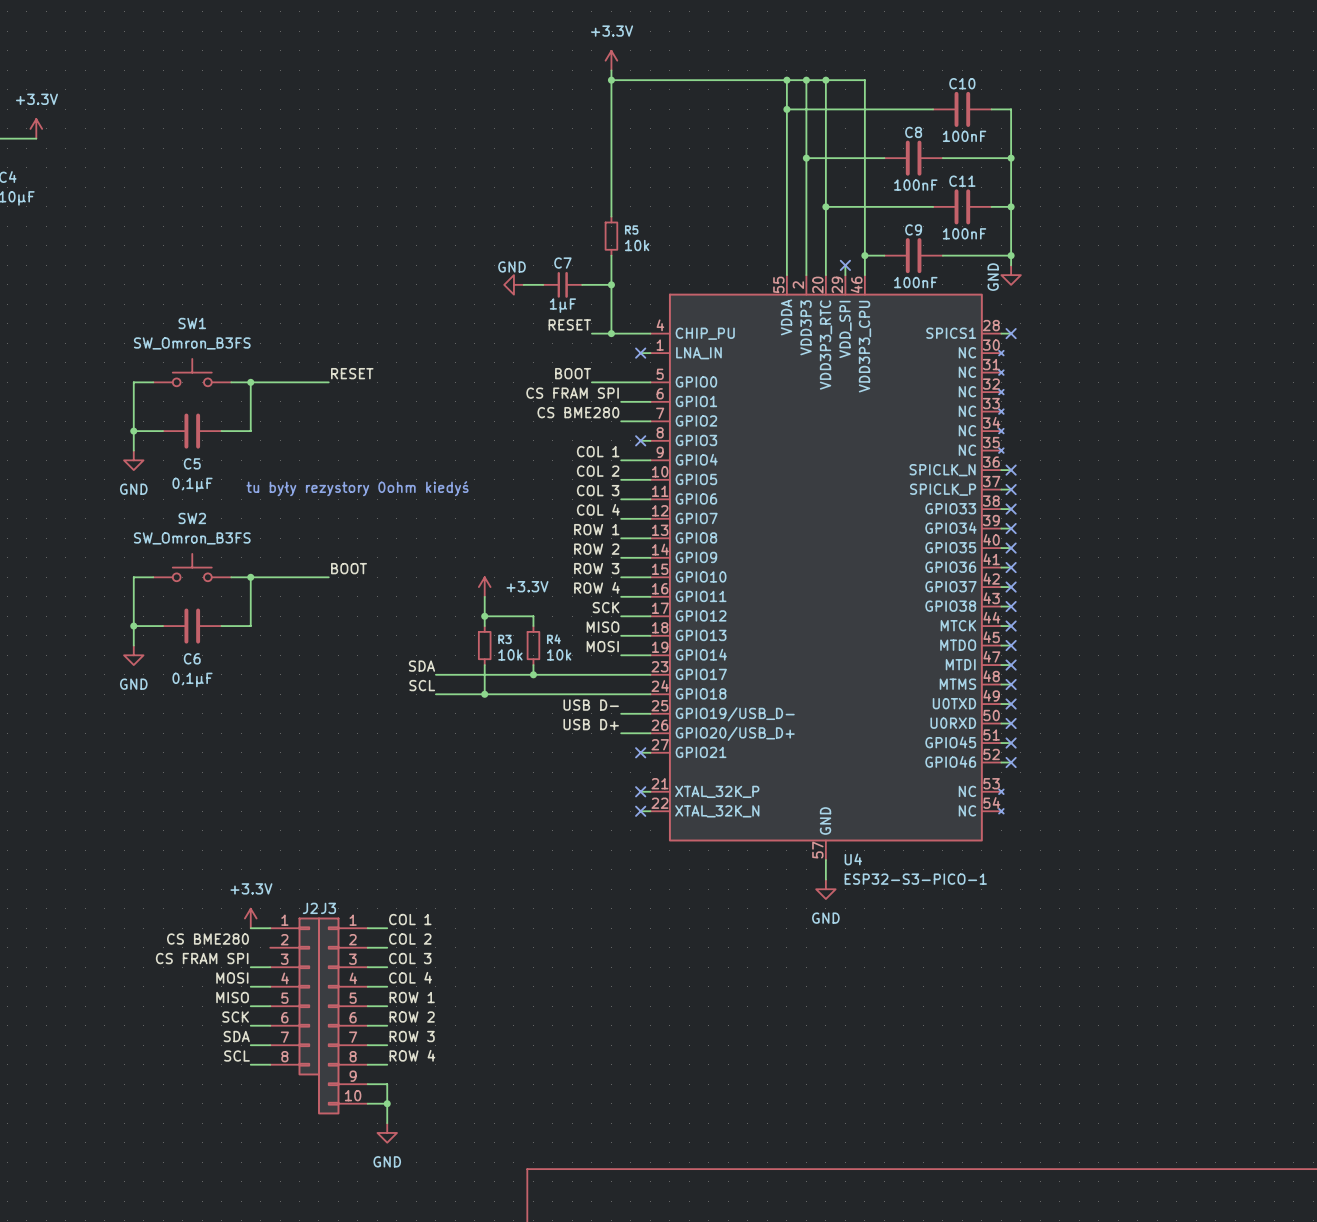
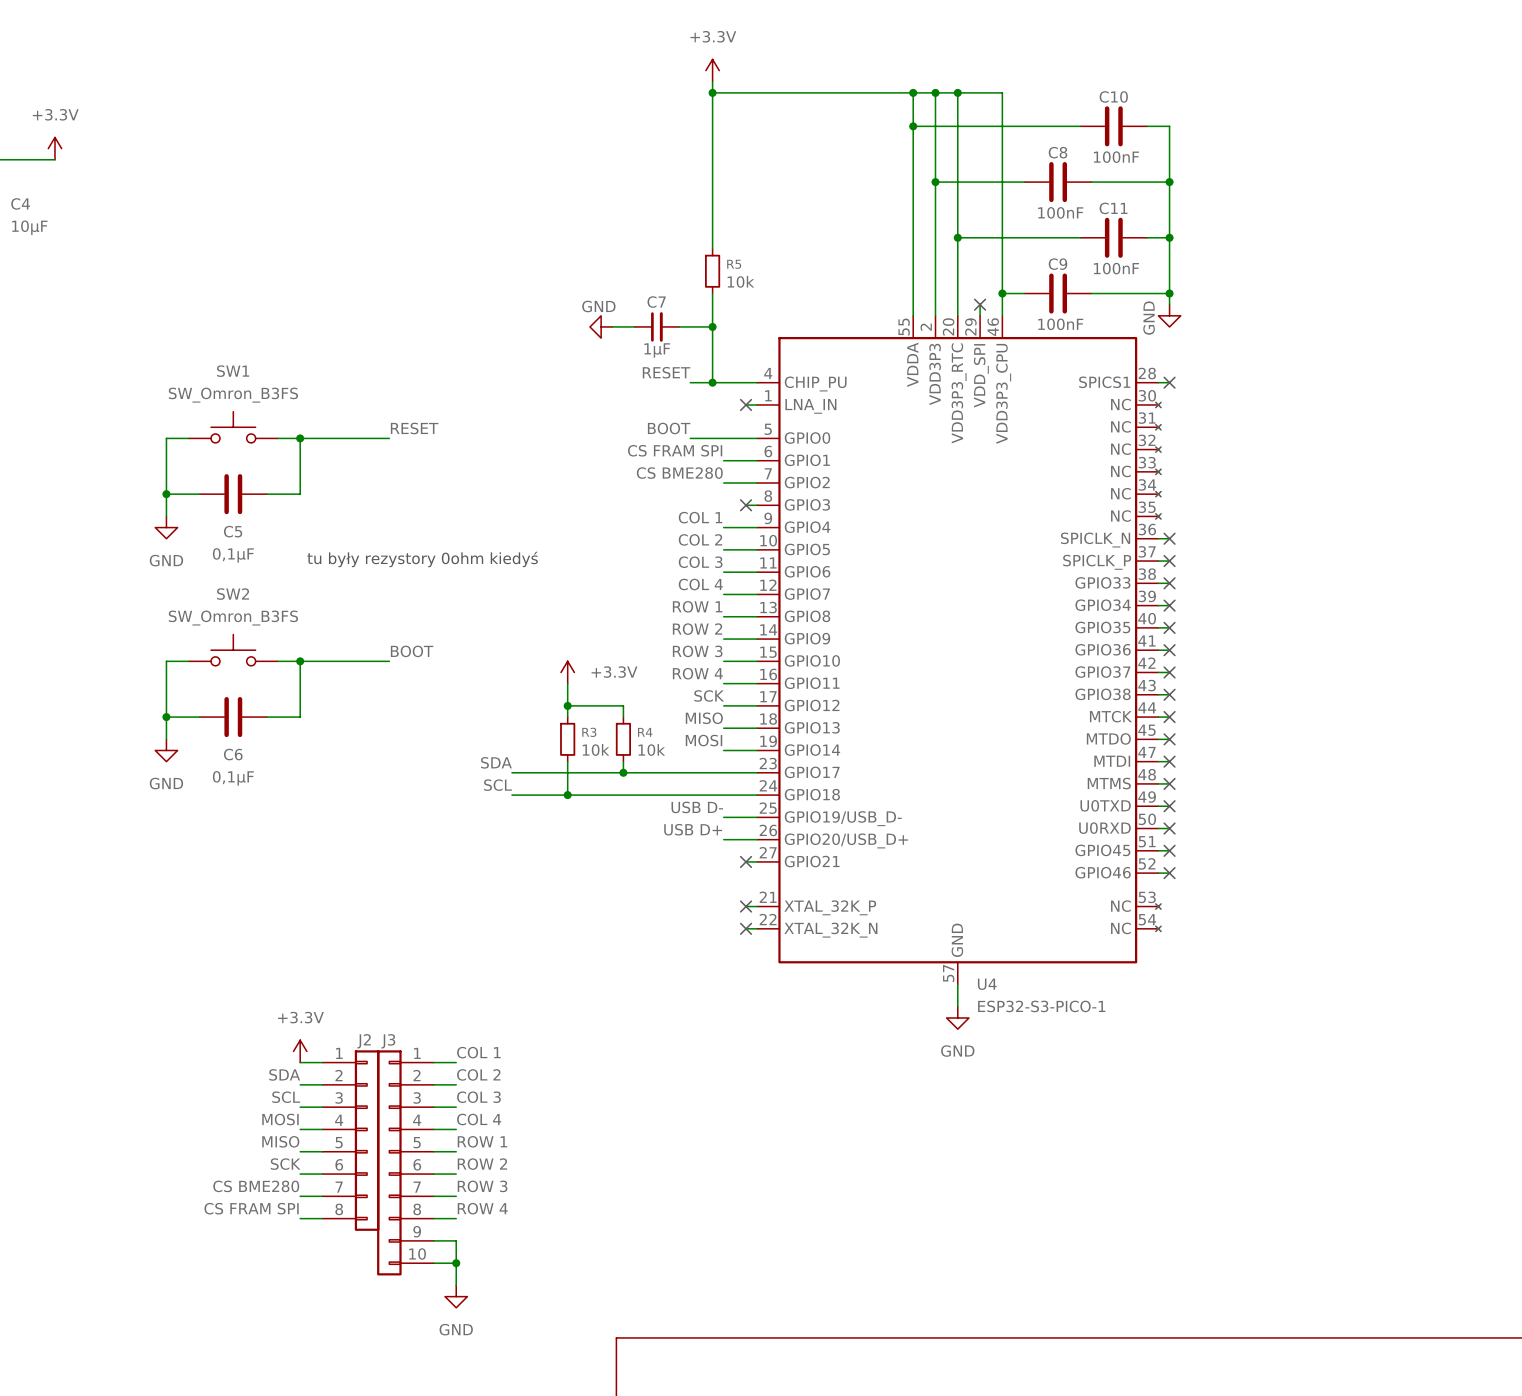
label: CS BME280 (207, 939) -> SDA (284, 1074)
wire: none -> (300, 1084) (322, 1084)
label: CS FRAM SPI (202, 958) -> SCL (286, 1097)
label: SDA (236, 1036) -> CS BME280 (256, 1186)
label: SCL (236, 1056) -> CS FRAM SPI (251, 1208)

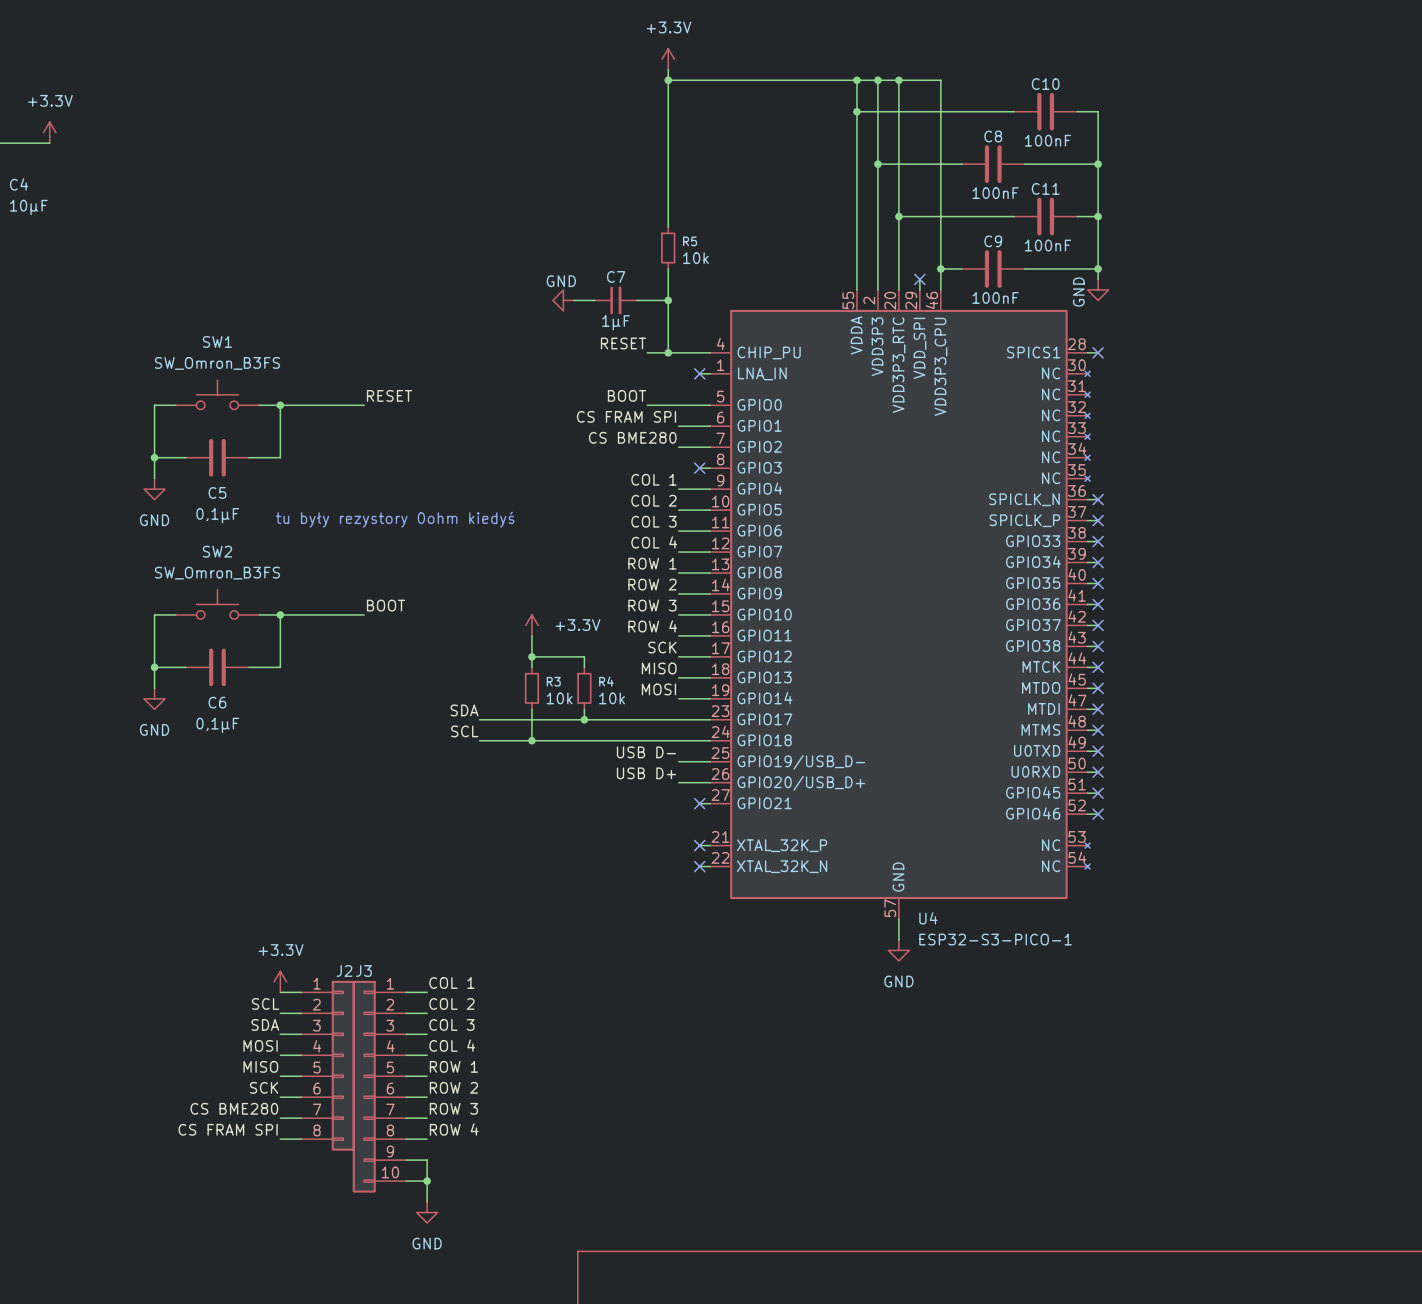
label: SDA (284, 1074) -> SCL (265, 1003)
label: SCL (286, 1097) -> SDA (265, 1024)

